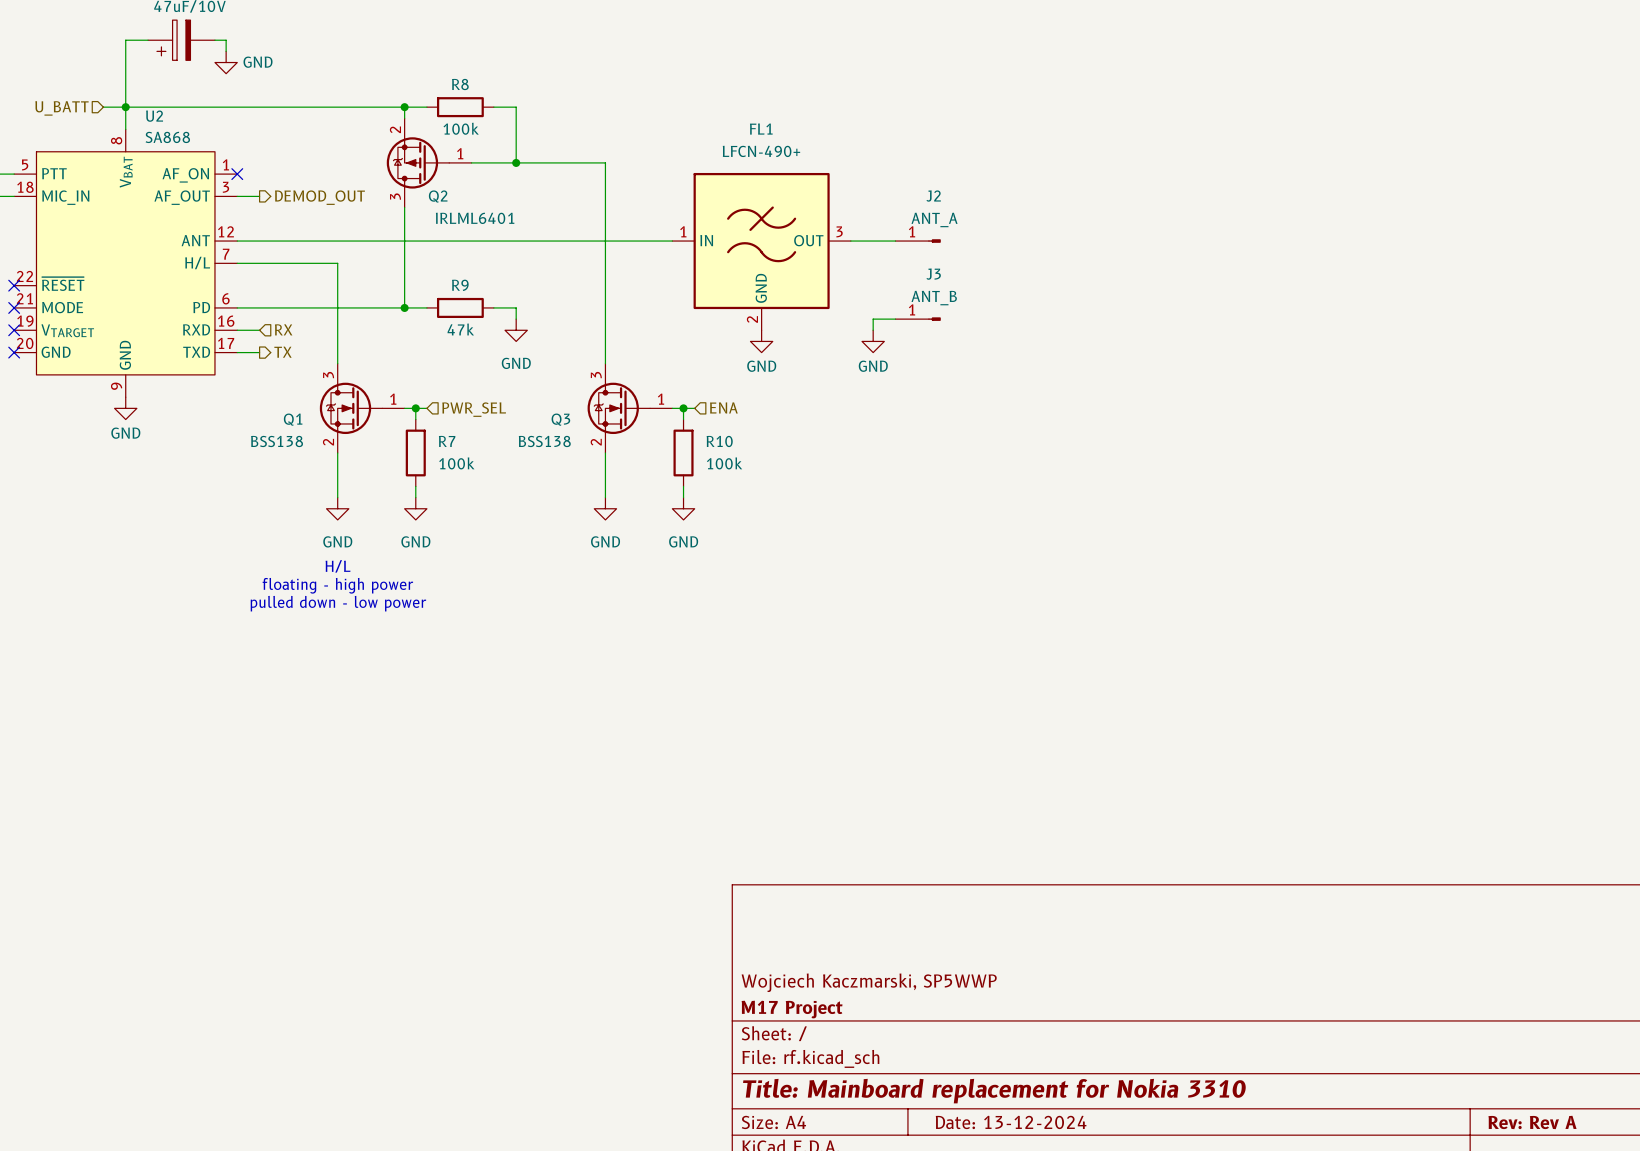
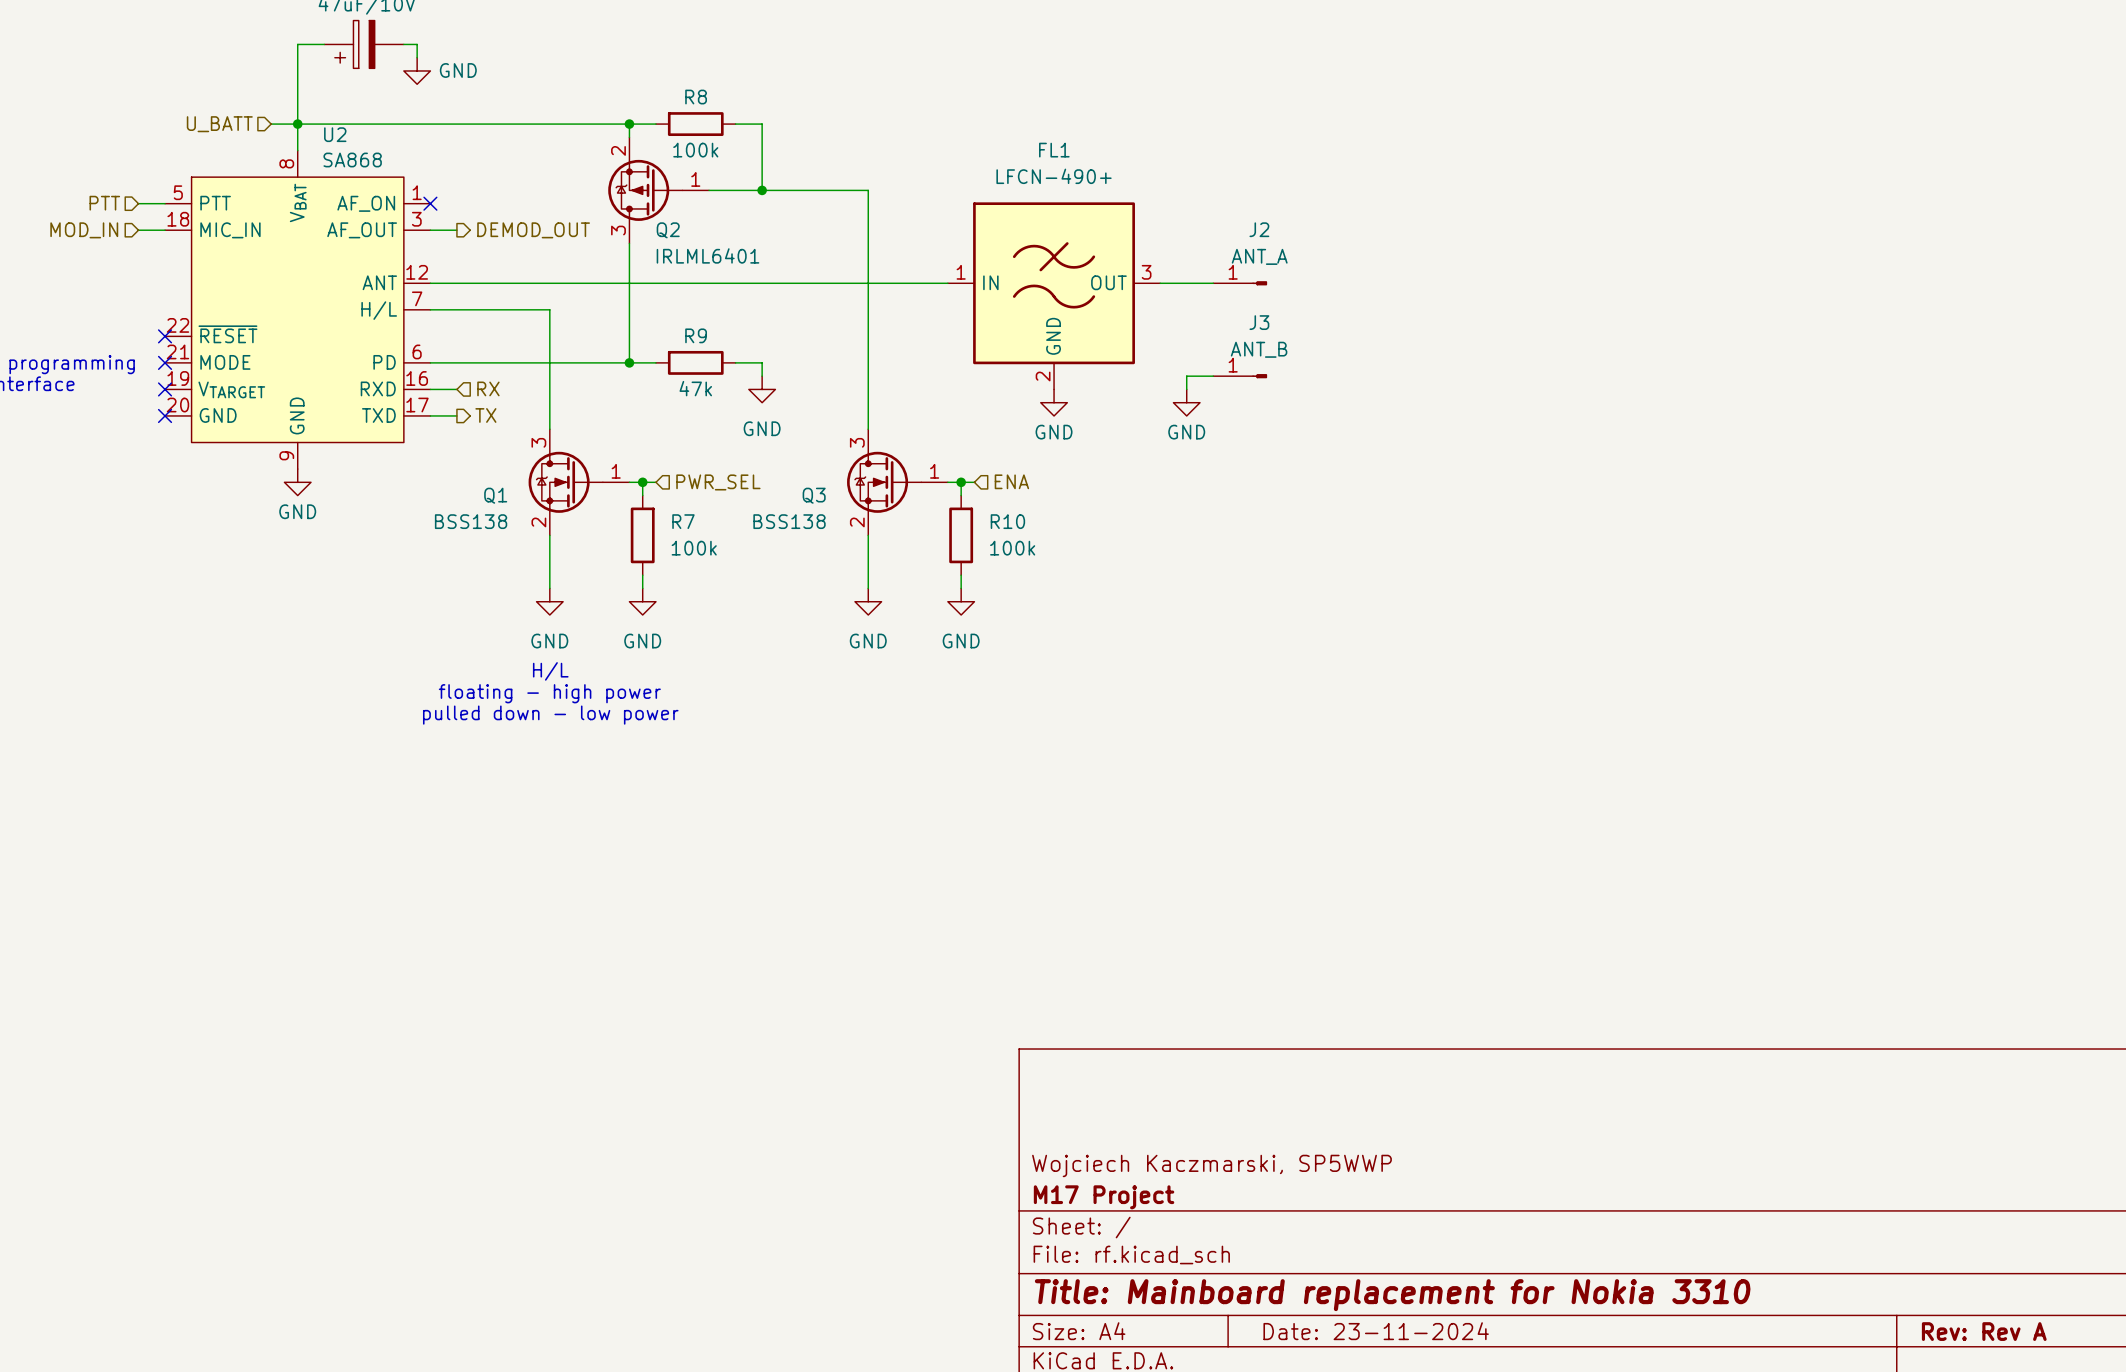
title block: Date: 13-12-2024 (1011, 1122) -> Date: 23-11-2024 (1376, 1331)

